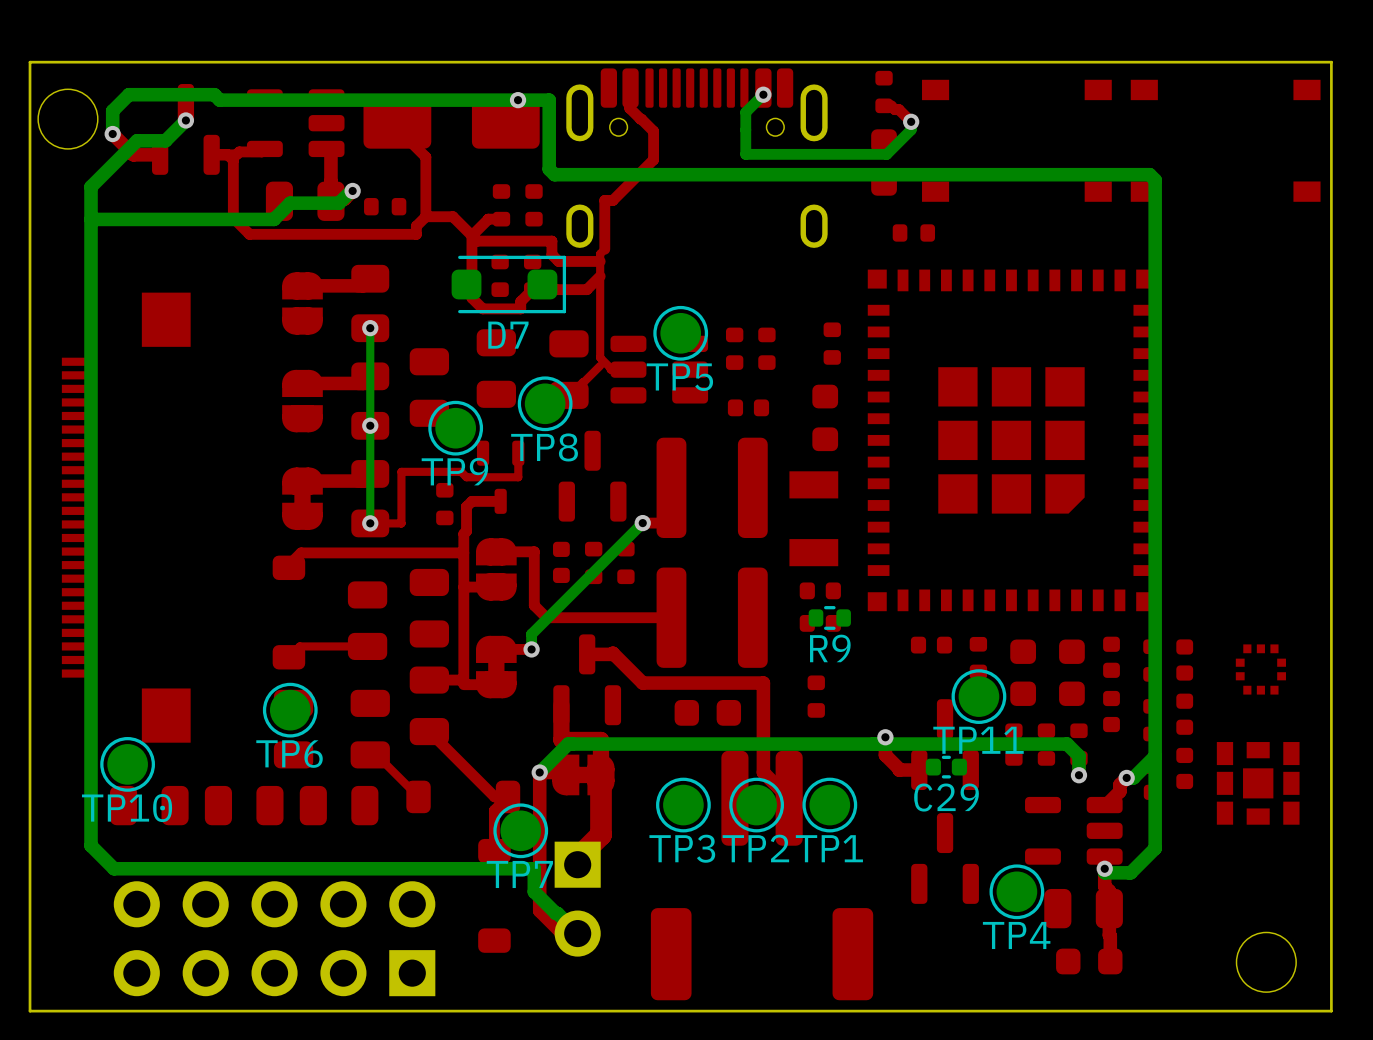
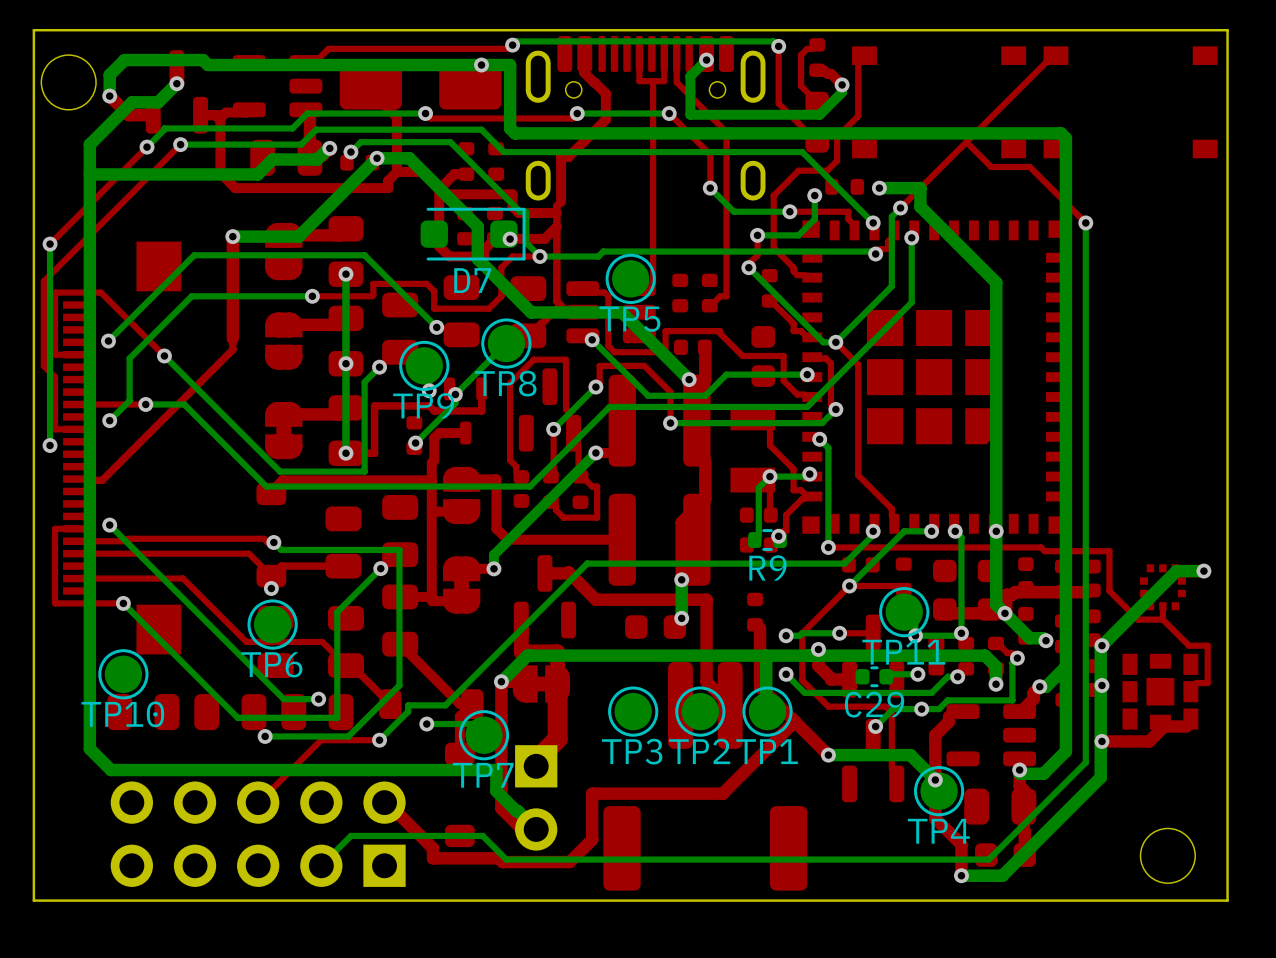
bottom track: none -> (512, 45) (516, 41) (773, 41) (778, 46)
top track: none -> (512, 45) (508, 48) (328, 48) (319, 57)
via: none -> (512, 45)
top track: none -> (778, 46) (778, 103) (809, 134)
via: none -> (778, 46)
top track: none -> (812, 48) (807, 48) (801, 55) (801, 86) (809, 96)
top track: none -> (858, 61) (858, 116) (837, 137) (837, 160) (827, 170) (798, 170) (773, 195) (773, 247) (793, 267) (793, 271) (797, 275) (804, 275)
top track: none -> (1047, 61) (900, 208)
top track: none -> (664, 70) (664, 81) (639, 81) (639, 70)
top track: none -> (676, 70) (676, 82) (726, 132) (726, 296) (720, 296) (715, 301)
top track: none -> (653, 81) (653, 283)
bottom track: none -> (425, 113) (307, 113) (292, 128) (164, 128) (147, 147)
via: none -> (425, 113)
top track: none -> (577, 113) (572, 118) (430, 118) (425, 113)
via: none -> (577, 113)
bottom track: none -> (669, 113) (577, 113)
top track: none -> (669, 113) (710, 154) (710, 188)
via: none -> (669, 113)
top track: none -> (966, 142) (991, 166) (1029, 166) (1085, 222)
bottom track: none -> (180, 144) (301, 144) (316, 129) (481, 129) (503, 152) (802, 152) (873, 222)
top track: none -> (180, 144) (43, 281) (43, 365) (55, 377) (55, 429) (64, 429)
via: none -> (180, 144)
top track: none -> (147, 147) (50, 244)
via: none -> (147, 147)
bottom track: none -> (350, 152) (360, 142) (450, 142) (520, 211) (526, 211) (526, 242) (539, 256) (598, 256) (603, 251) (873, 251) (875, 254)
via: none -> (350, 152)
via: none -> (377, 158)
bottom track: none -> (710, 188) (733, 211) (789, 211)
via: none -> (710, 188)
bottom track: none -> (879, 188) (920, 188) (920, 206) (996, 282) (996, 604) (1029, 638) (1043, 638) (1046, 640)
via: none -> (879, 188)
bottom track: none -> (814, 195) (814, 219) (798, 235) (757, 235)
via: none -> (814, 195)
bottom track: none -> (900, 208) (891, 216) (891, 286) (835, 342) (823, 342) (748, 267)
via: none -> (900, 208)
top track: none -> (789, 211) (848, 211) (848, 219) (852, 222)
via: none -> (789, 211)
via: none -> (873, 222)
bottom track: none -> (1085, 222) (1085, 762) (988, 859) (506, 859) (482, 835) (350, 835) (333, 853)
via: none -> (1085, 222)
top track: none -> (757, 235) (757, 255) (748, 263) (748, 267)
via: none -> (757, 235)
bottom track: none -> (232, 236) (298, 236) (377, 158) (409, 158) (477, 226) (477, 259) (531, 312) (622, 312) (689, 379)
top track: none -> (232, 236) (232, 349) (102, 480) (91, 480) (91, 489)
via: none -> (232, 236)
top track: none -> (891, 237) (888, 241) (888, 249) (880, 249) (875, 254)
bottom track: none -> (911, 237) (911, 302) (807, 406) (609, 406) (530, 486) (266, 486) (184, 404) (145, 404)
via: none -> (911, 237)
via: none -> (510, 239)
bottom track: none -> (50, 244) (50, 445)
via: none -> (50, 244)
via: none -> (875, 254)
top track: none -> (539, 256) (512, 256) (501, 267) (501, 296) (488, 308) (434, 308) (434, 291) (426, 283) (373, 283) (372, 296) (312, 296)
via: none -> (539, 256)
via: none -> (748, 267)
top track: none -> (595, 292) (604, 292) (608, 296) (608, 346) (614, 352) (664, 352) (665, 331) (720, 331) (720, 333) (742, 355) (783, 355) (783, 380) (797, 394) (804, 394)
bottom track: none -> (312, 296) (191, 296) (129, 358) (129, 400) (109, 420)
via: none -> (312, 296)
top track: none -> (774, 305) (793, 323) (793, 331) (801, 331) (804, 334)
bottom track: none -> (436, 327) (364, 255) (194, 255) (108, 341)
via: none -> (436, 327)
bottom track: none -> (592, 339) (648, 395) (705, 395) (726, 374) (807, 374)
via: none -> (592, 339)
via: none -> (108, 341)
top track: none -> (835, 342) (858, 364) (858, 475) (891, 508) (891, 516)
via: none -> (835, 342)
top track: none -> (705, 352) (705, 379)
top track: none -> (64, 354) (55, 354) (55, 292) (101, 292) (164, 355)
bottom track: none -> (495, 354) (455, 394) (455, 403) (415, 443)
bottom track: none -> (164, 355) (280, 471) (364, 471) (364, 382) (379, 367)
via: none -> (164, 355)
top track: none -> (819, 358) (825, 358) (830, 363) (830, 404) (835, 409)
via: none -> (379, 367)
via: none -> (807, 374)
via: none -> (689, 379)
bottom track: none -> (595, 387) (553, 429)
top track: none -> (595, 387) (599, 383) (599, 365) (644, 365) (670, 392) (670, 423)
via: none -> (595, 387)
via: none -> (429, 390)
via: none -> (455, 394)
top track: none -> (145, 404) (91, 404)
via: none -> (145, 404)
bottom track: none -> (835, 409) (822, 423) (670, 423)
via: none -> (835, 409)
top track: none -> (569, 418) (569, 413) (566, 409) (566, 359) (533, 359) (510, 383) (510, 460) (516, 466) (516, 472)
via: none -> (109, 420)
via: none -> (670, 423)
top track: none -> (769, 425) (769, 445) (793, 469) (793, 490) (801, 490) (804, 494)
top track: none -> (553, 429) (553, 472)
via: none -> (553, 429)
bottom track: none -> (819, 439) (828, 447) (828, 547)
via: none -> (819, 439)
via: none -> (415, 443)
via: none -> (50, 445)
top track: none -> (578, 447) (578, 472) (592, 486) (597, 486) (597, 517) (563, 517) (556, 510) (556, 506)
top track: none -> (705, 461) (705, 498) (681, 522) (681, 579)
bottom track: none -> (809, 474) (807, 476) (769, 476) (758, 487) (758, 535)
via: none -> (809, 474)
top track: none -> (769, 476) (769, 510)
via: none -> (769, 476)
top track: none -> (804, 498) (802, 498) (786, 515) (786, 531) (783, 531) (774, 540)
bottom track: none -> (109, 525) (283, 699) (318, 699)
via: none -> (109, 525)
top track: none -> (64, 528) (55, 528) (55, 603) (123, 603)
bottom track: none -> (873, 531) (873, 535) (844, 563) (587, 563) (445, 705) (408, 705) (408, 711) (379, 740)
via: none -> (873, 531)
bottom track: none -> (931, 531) (904, 531) (849, 586)
via: none -> (931, 531)
bottom track: none -> (955, 531) (961, 537) (961, 633) (958, 635) (915, 635) (915, 623)
via: none -> (955, 531)
via: none -> (996, 531)
via: none -> (778, 536)
top track: none -> (91, 541) (125, 541) (128, 538) (263, 538) (267, 542) (273, 542)
bottom track: none -> (273, 542) (281, 549) (399, 549) (399, 685) (348, 736) (265, 736)
via: none -> (273, 542)
top track: none -> (828, 547) (1041, 547) (1044, 551) (1109, 551) (1109, 590) (1138, 619) (1162, 619)
via: none -> (828, 547)
top track: none -> (91, 553) (248, 553) (271, 576) (271, 588)
bottom track: none -> (380, 568) (337, 612) (337, 717) (237, 717) (123, 603)
via: none -> (380, 568)
bottom track: none -> (1203, 571) (1176, 571) (1100, 646) (1100, 777) (1002, 875) (961, 875)
via: none -> (1203, 571)
top track: none -> (91, 578) (183, 578) (246, 641) (322, 641) (345, 665)
bottom track: none -> (681, 579) (681, 618)
via: none -> (681, 579)
via: none -> (849, 586)
top track: none -> (898, 586) (849, 586) (802, 633) (802, 680) (828, 706) (885, 706) (891, 712) (891, 768)
via: none -> (271, 588)
top track: none -> (1088, 592) (1014, 592) (1012, 594) (1006, 594) (1004, 613) (952, 613)
via: none -> (123, 603)
top track: none -> (1162, 608) (1162, 619)
via: none -> (1004, 613)
via: none -> (681, 618)
top track: none -> (1162, 619) (1189, 645) (1207, 645) (1207, 683) (1195, 684)
top track: none -> (760, 628) (760, 686) (828, 755)
bottom track: none -> (839, 633) (802, 633) (799, 635) (786, 635)
via: none -> (839, 633)
top track: none -> (868, 633) (839, 633)
via: none -> (961, 633)
via: none -> (786, 635)
via: none -> (915, 635)
via: none -> (1046, 640)
via: none -> (1101, 645)
top track: none -> (1001, 646) (1007, 653) (1012, 653) (1017, 658)
bottom track: none -> (766, 655) (766, 700)
bottom track: none -> (1017, 658) (1012, 663) (1012, 700) (947, 700) (939, 709) (893, 709) (875, 726)
via: none -> (1017, 658)
bottom track: none -> (786, 674) (804, 692) (931, 692) (947, 676) (957, 676)
via: none -> (786, 674)
bottom track: none -> (917, 674) (890, 674)
via: none -> (917, 674)
via: none -> (957, 676)
via: none -> (1101, 685)
via: none -> (318, 699)
via: none -> (921, 709)
top track: none -> (949, 716) (949, 721) (935, 735) (935, 818) (961, 844) (961, 875)
top track: none -> (794, 721) (722, 793) (592, 793) (592, 839) (569, 862) (502, 862) (498, 858) (433, 858) (433, 848) (399, 814) (396, 814)
via: none -> (426, 724)
bottom track: none -> (472, 724) (426, 724)
via: none -> (875, 726)
top track: none -> (1186, 726) (1164, 726) (1149, 741) (1101, 741)
via: none -> (265, 736)
top track: none -> (379, 740) (321, 740) (271, 789)
via: none -> (379, 740)
via: none -> (1101, 741)
bottom track: none -> (828, 755) (910, 755) (935, 779)
via: none -> (828, 755)
via: none -> (935, 779)
via: none -> (961, 875)

